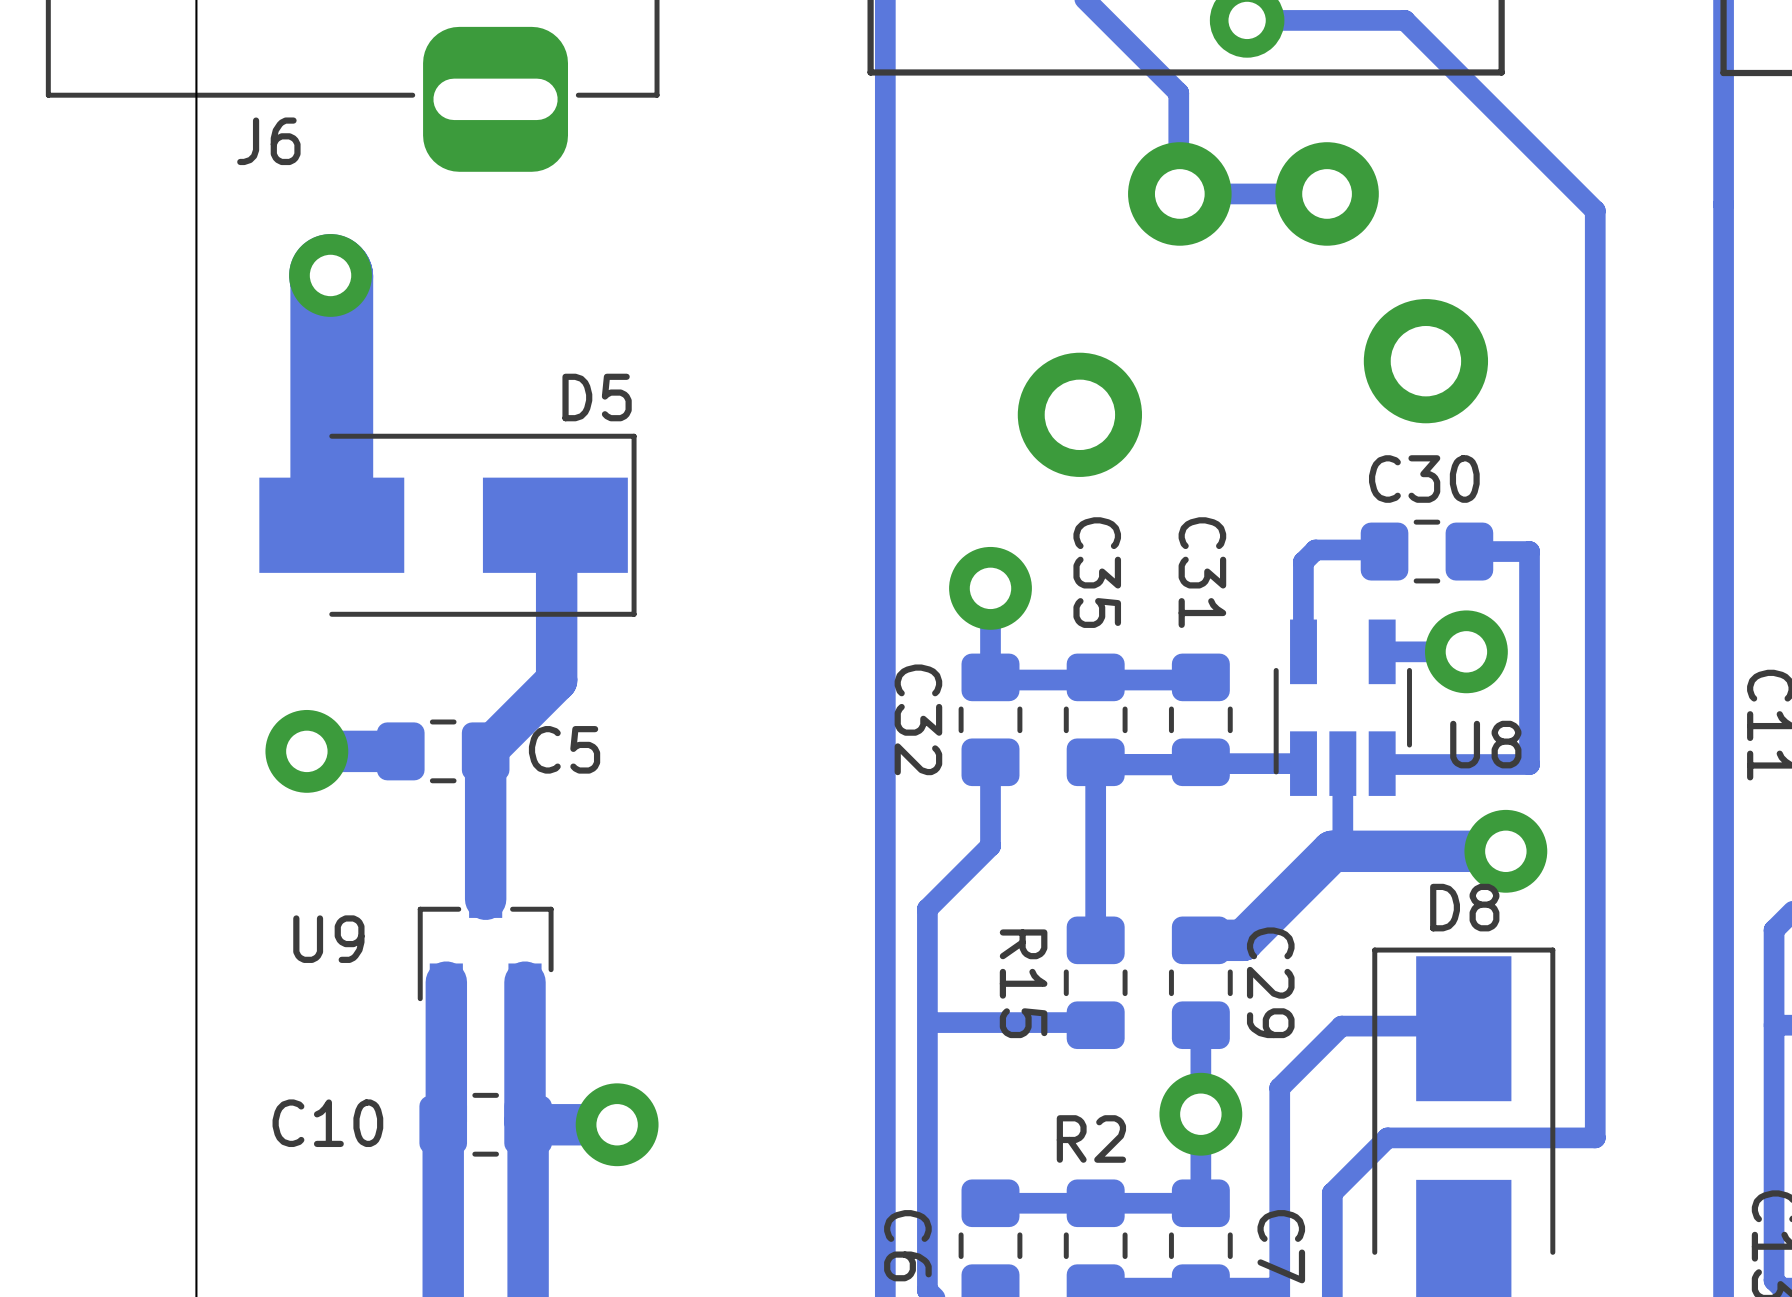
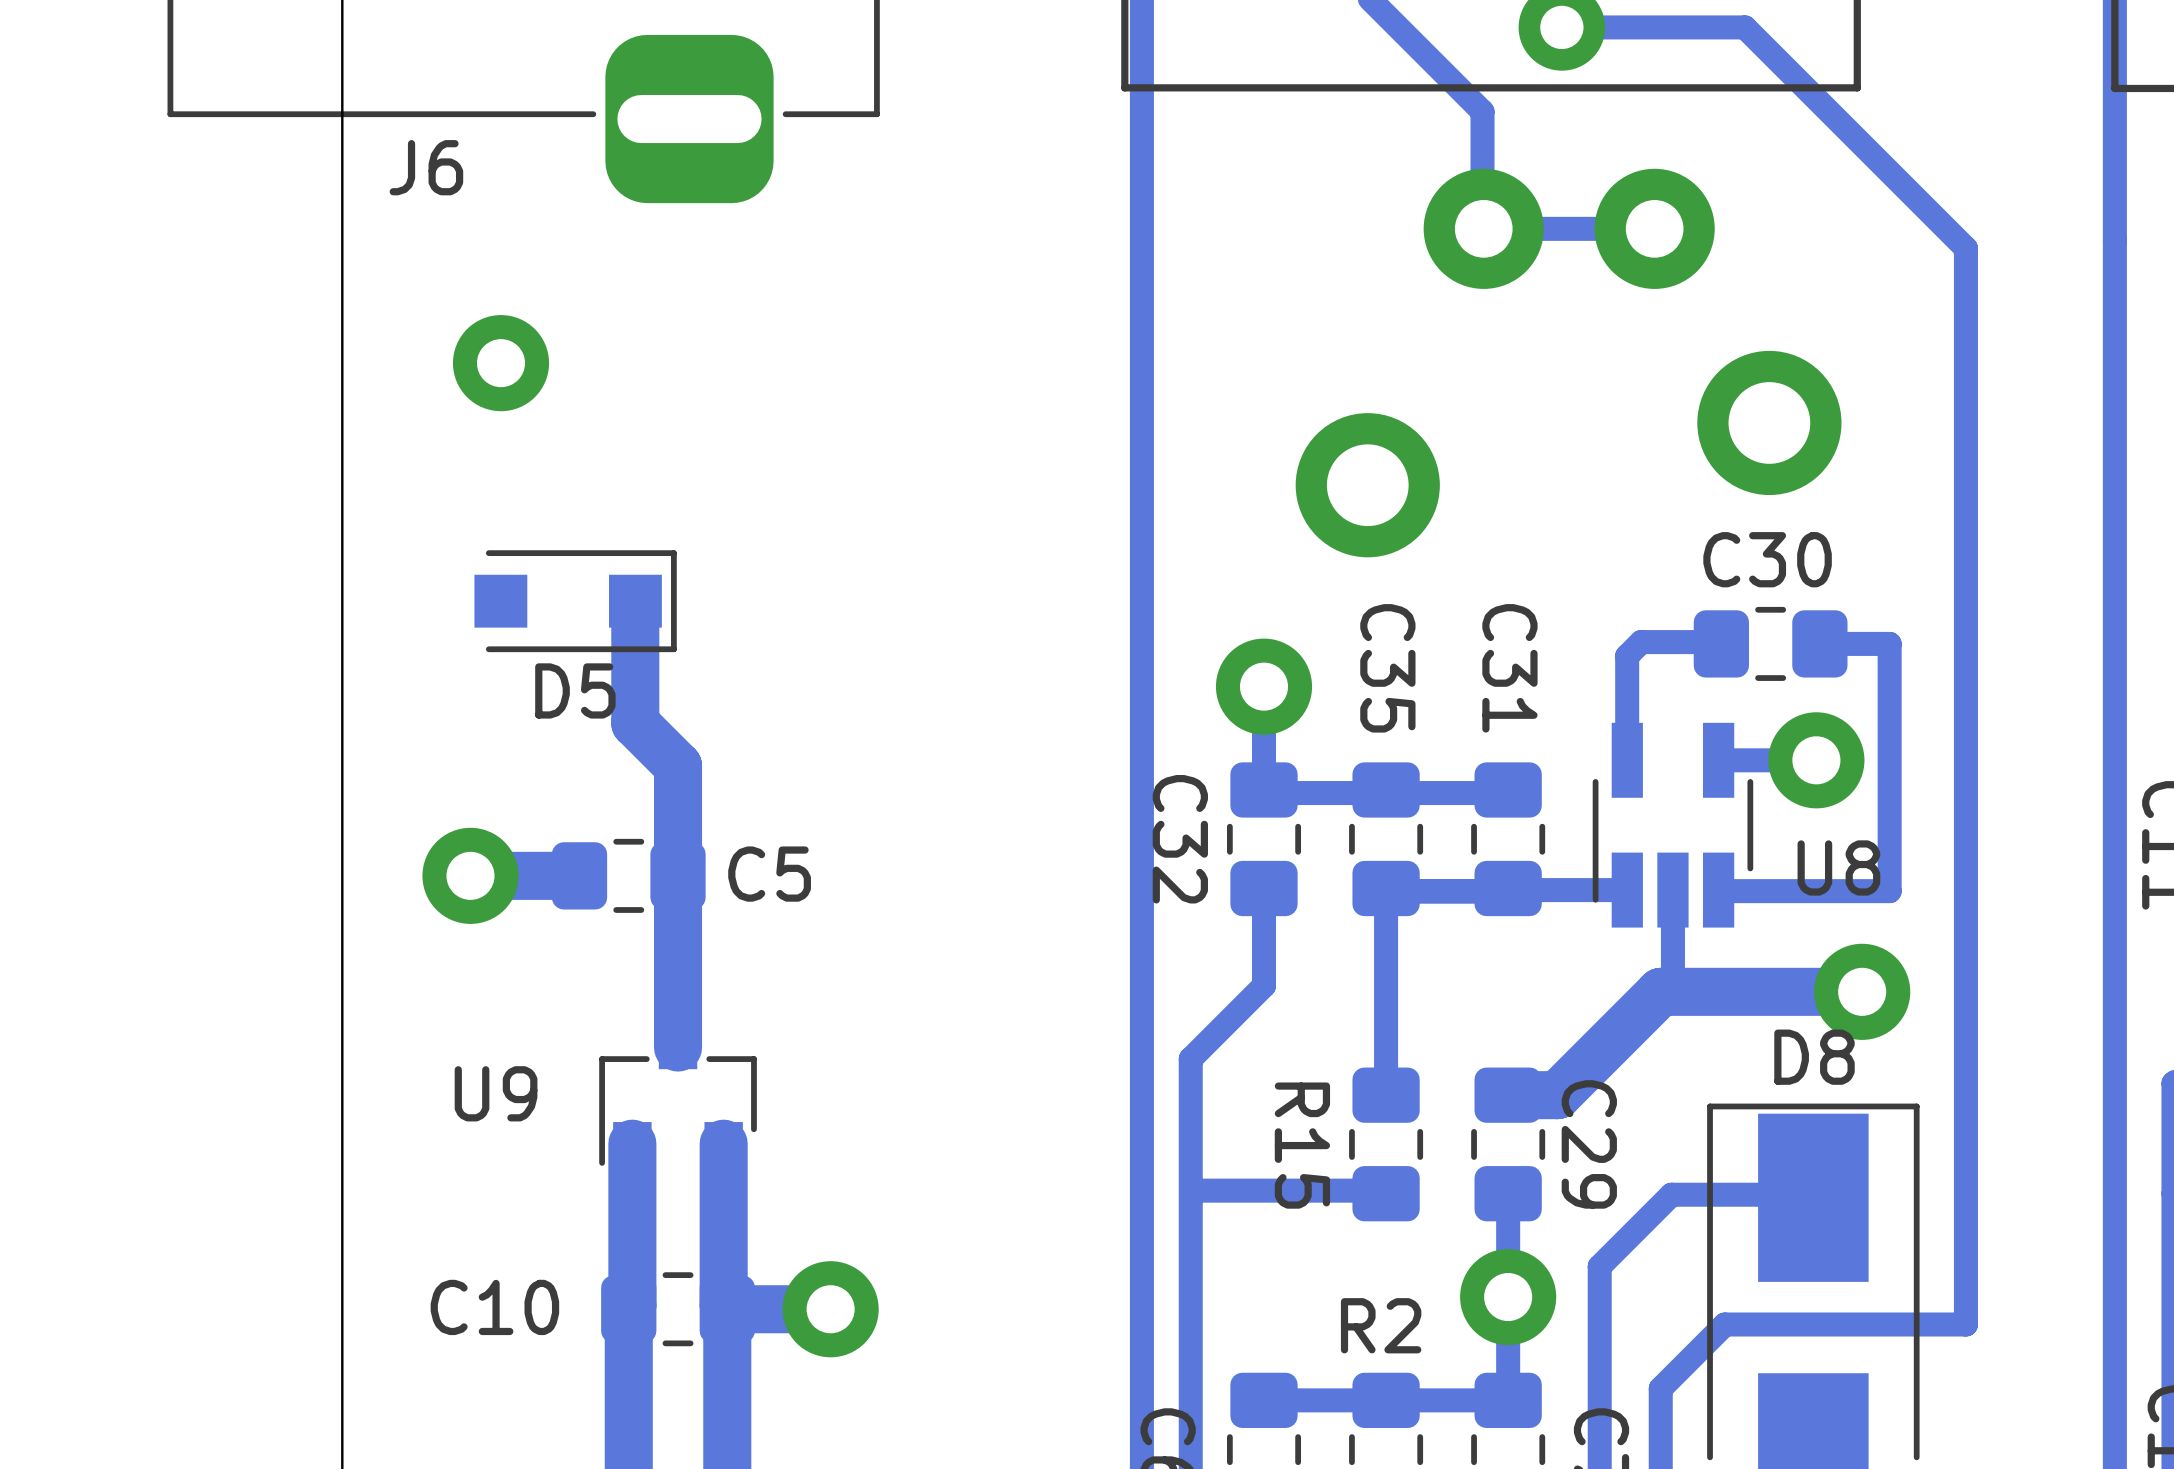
track: (330, 275) (331, 525) -> none
via position: (330, 275) -> (501, 363)
D5 name position: D5 (597, 397) -> D5 (575, 690)
D5 footprint: [259, 433, 637, 617] -> [474, 550, 677, 653]
track: none -> (635, 601) (635, 723) (678, 765) (678, 875)
track: (556, 530) (556, 680) (483, 754) -> none

